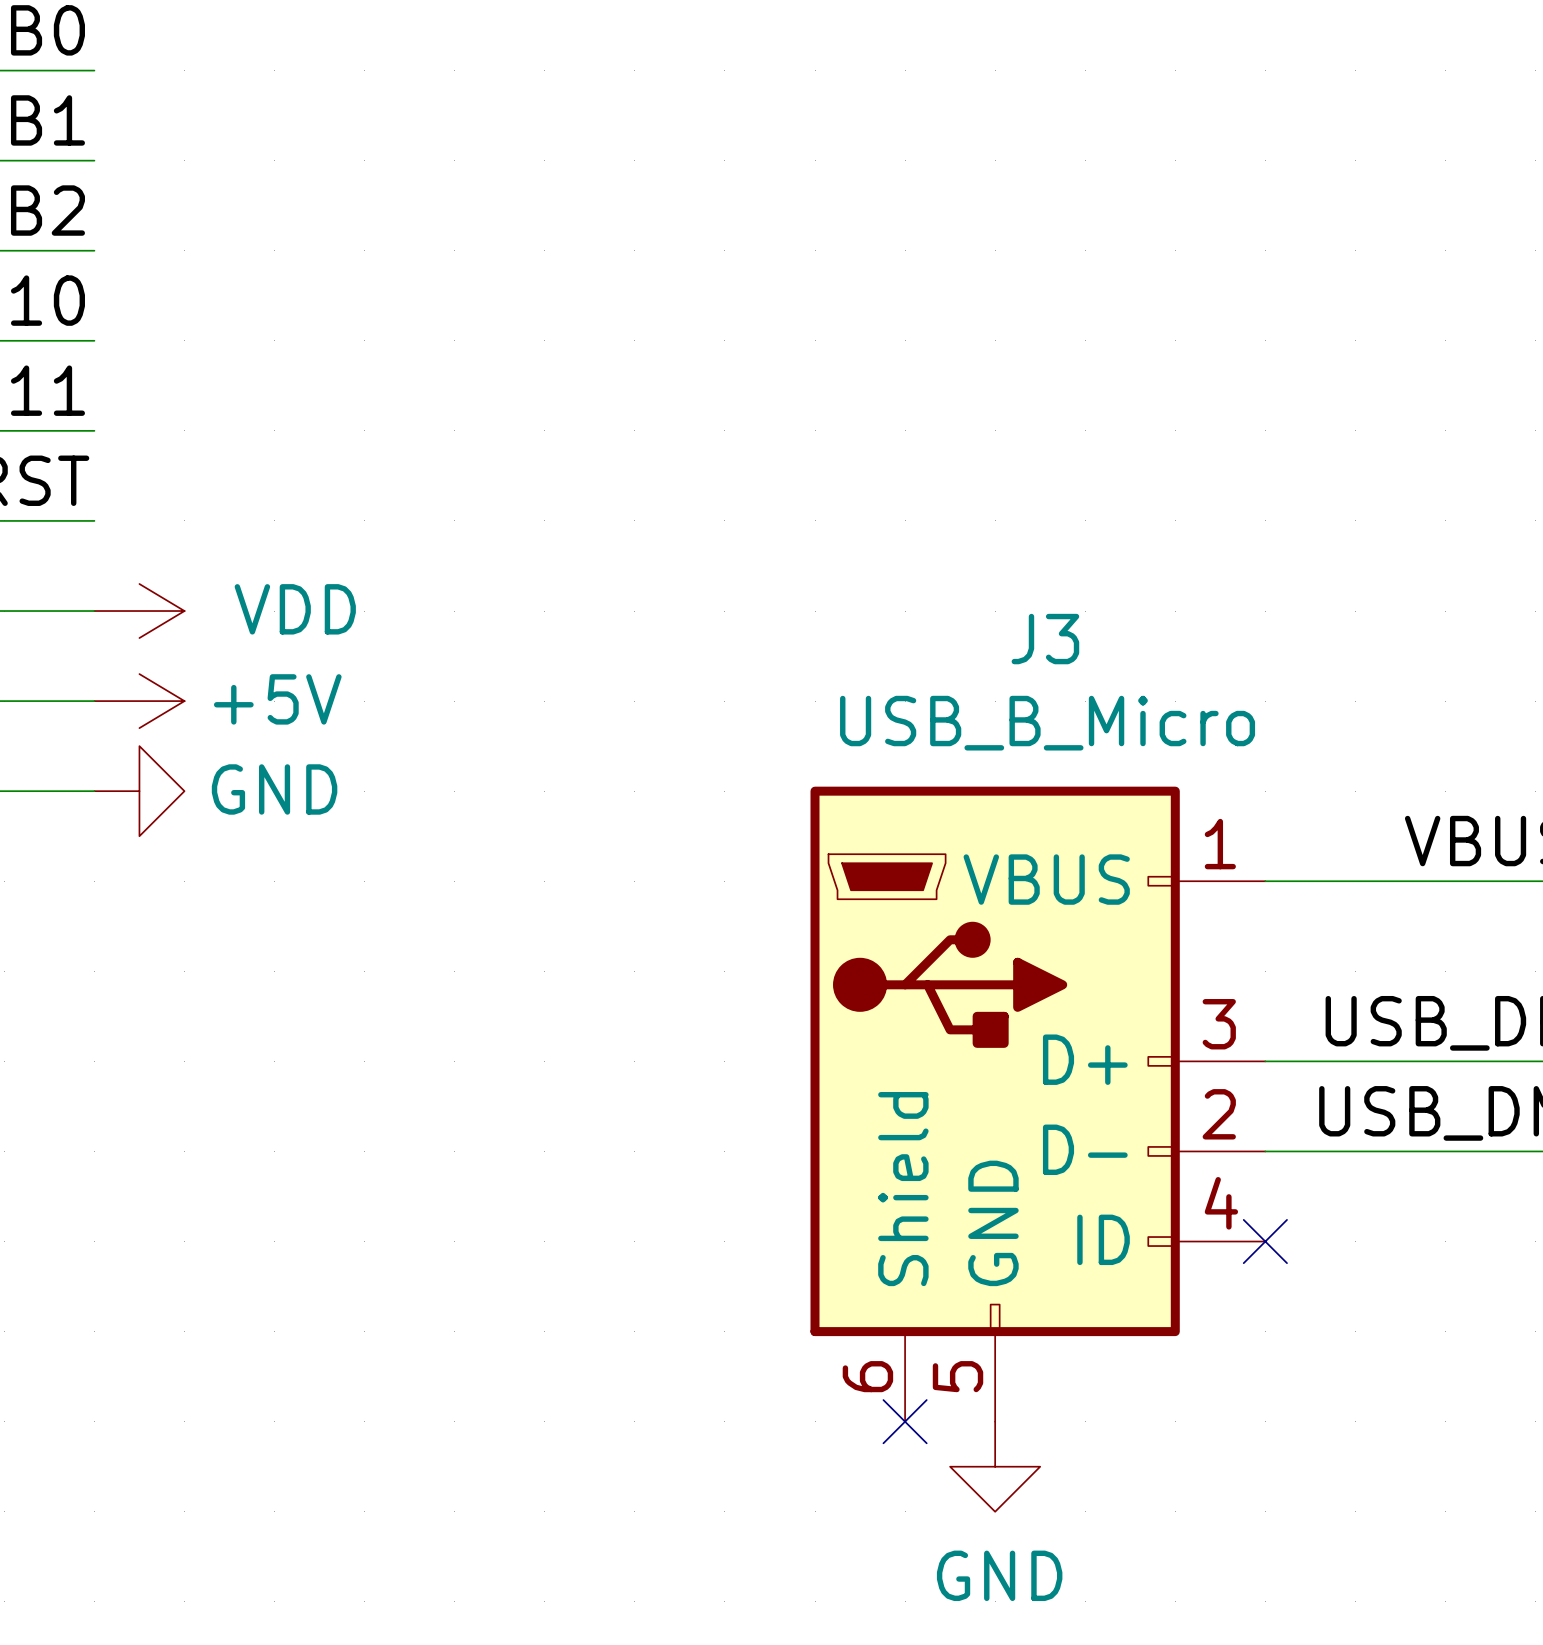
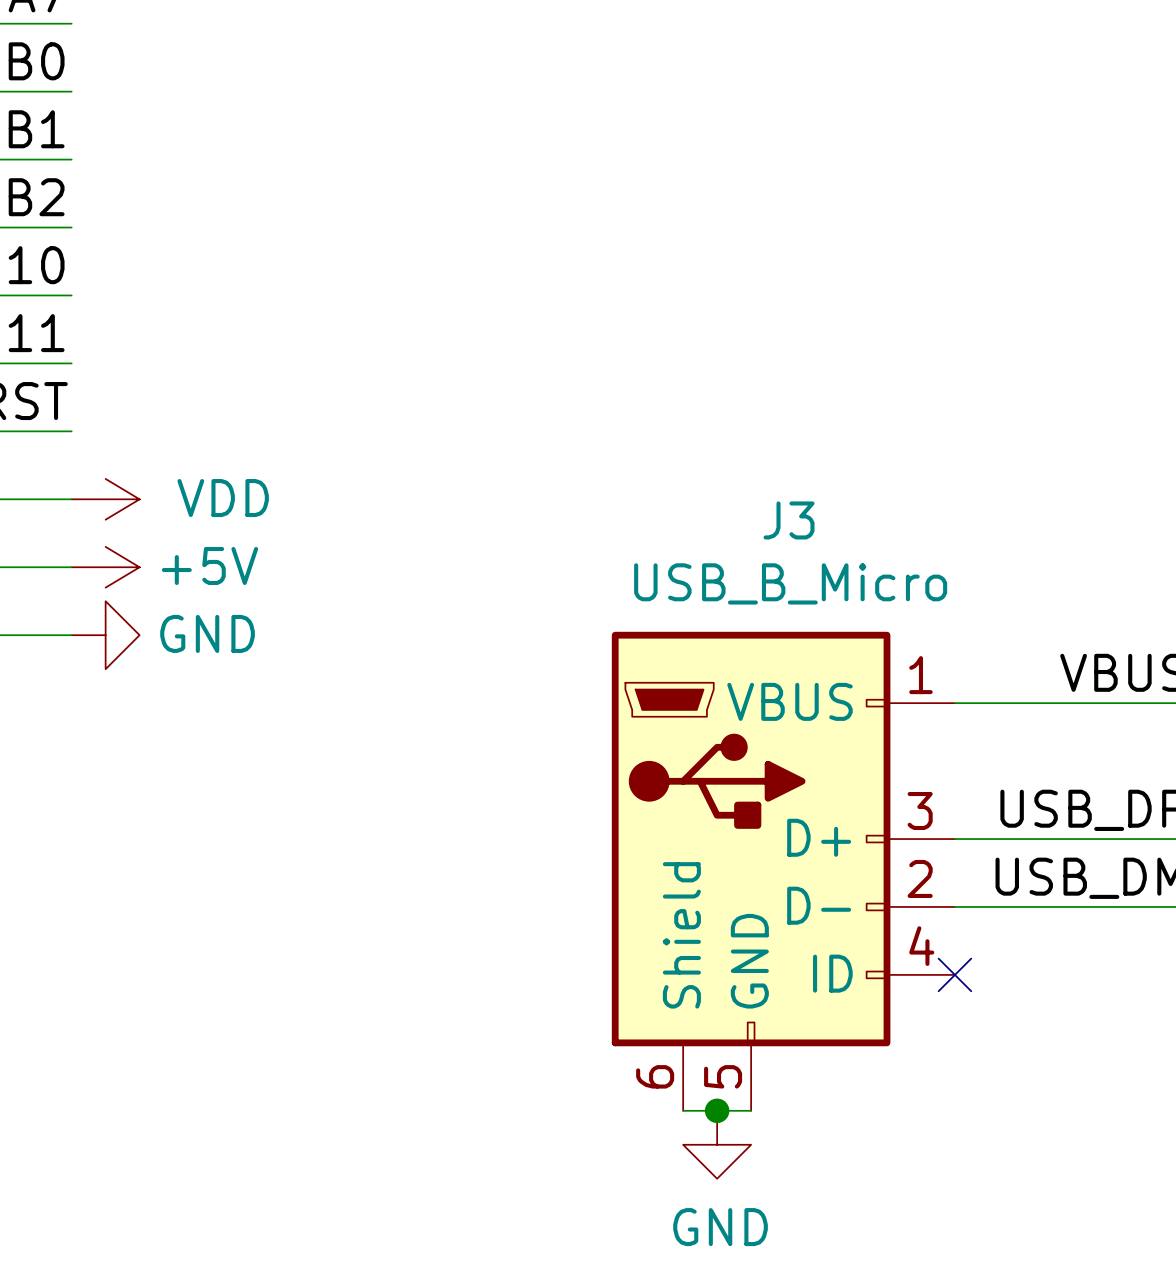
wire: none -> (683, 1110) (751, 1110)
no-connect mark: (905, 1421) -> none
junction: none -> (717, 1110)
power symbol position: GND (995, 1466) -> GND (717, 1144)

